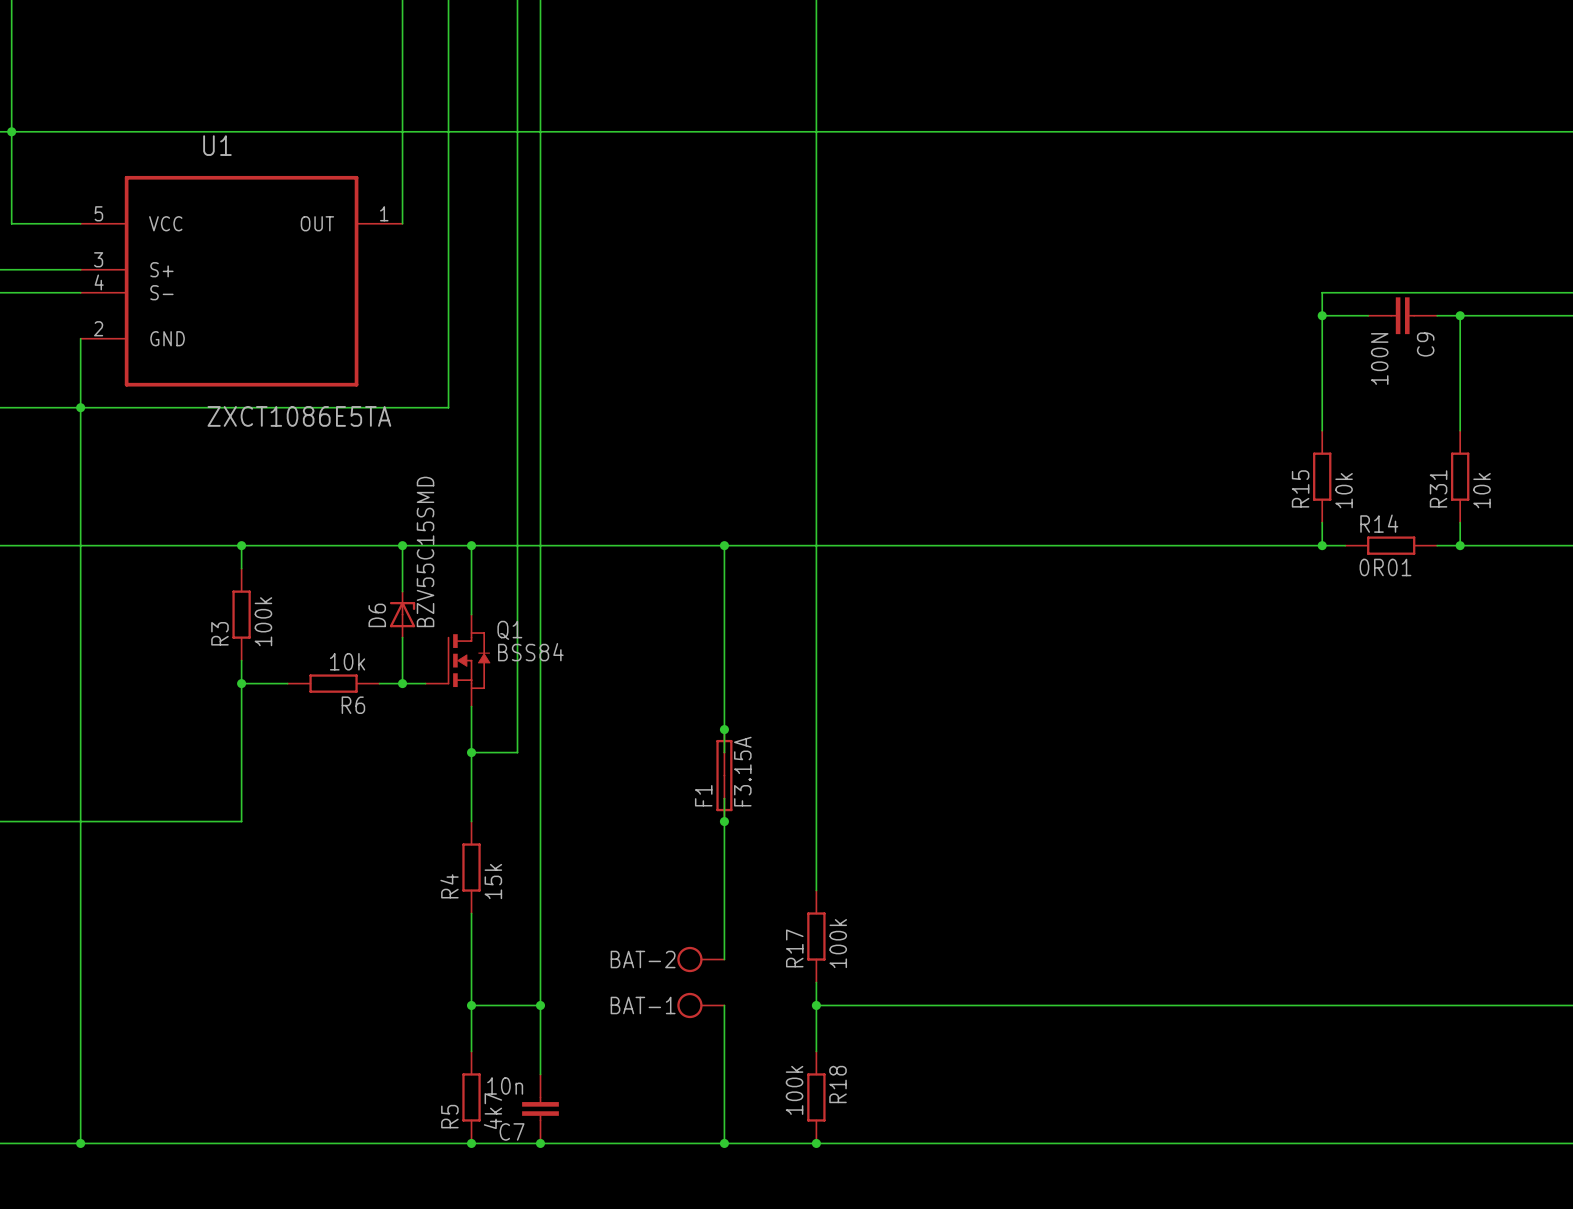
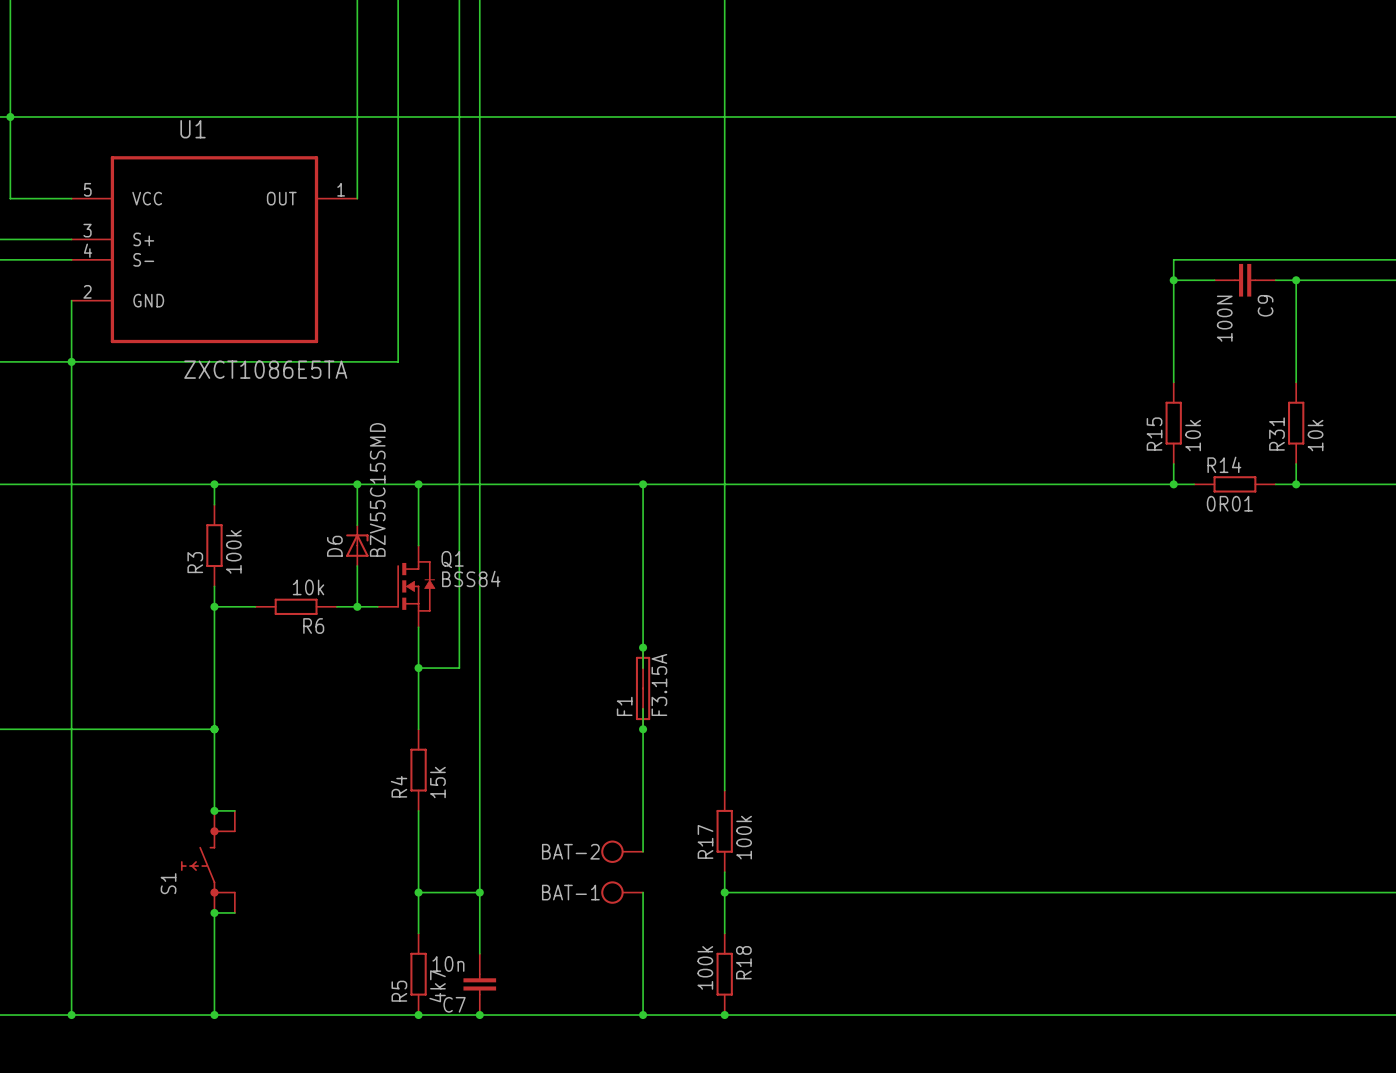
wire: none -> (214, 729) (214, 810) (234, 810)
junction: none -> (214, 729)
junction: none -> (214, 810)
S1: none -> (208, 861)
junction: none -> (214, 912)
wire: none -> (234, 912) (214, 912) (214, 1015)
junction: none -> (214, 1015)

